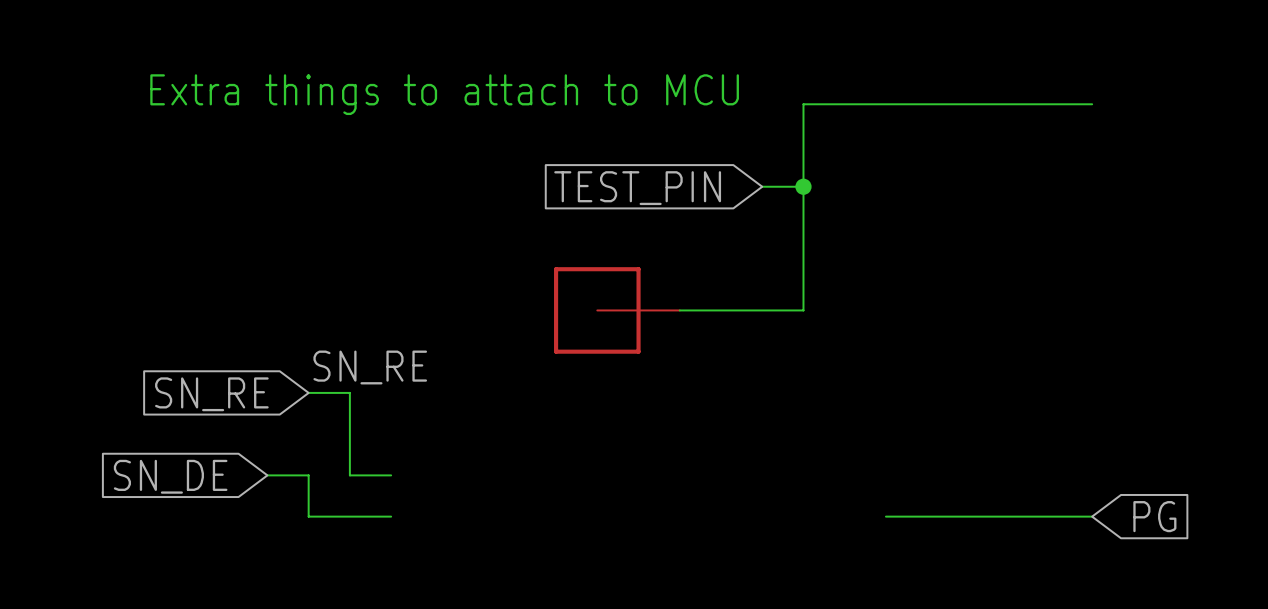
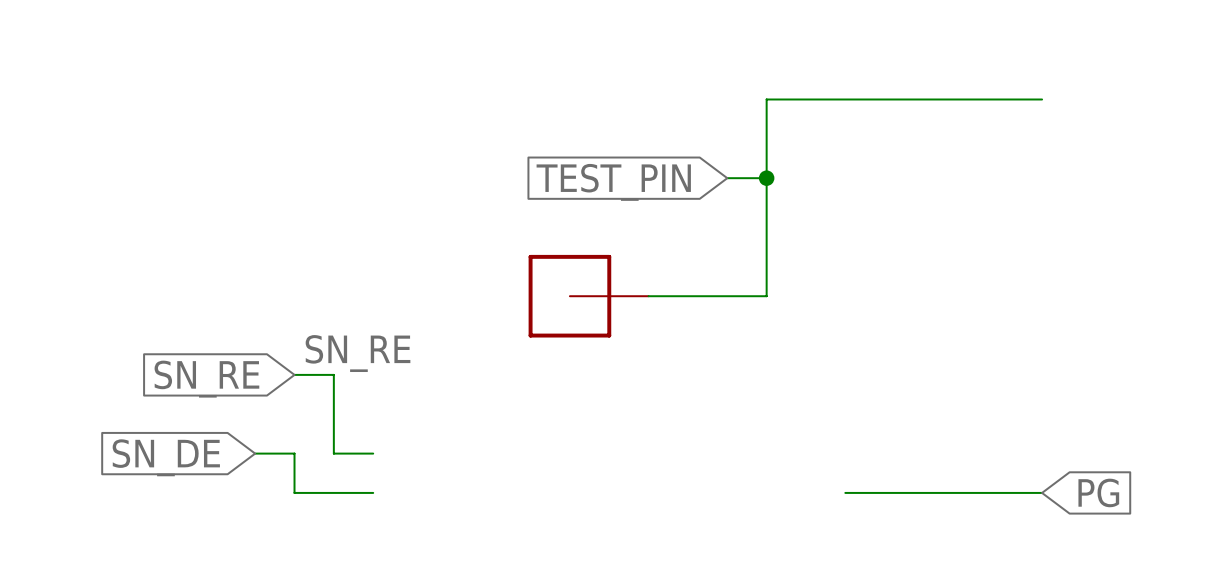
text: Extra things to attach to MCU (444, 94) -> none

